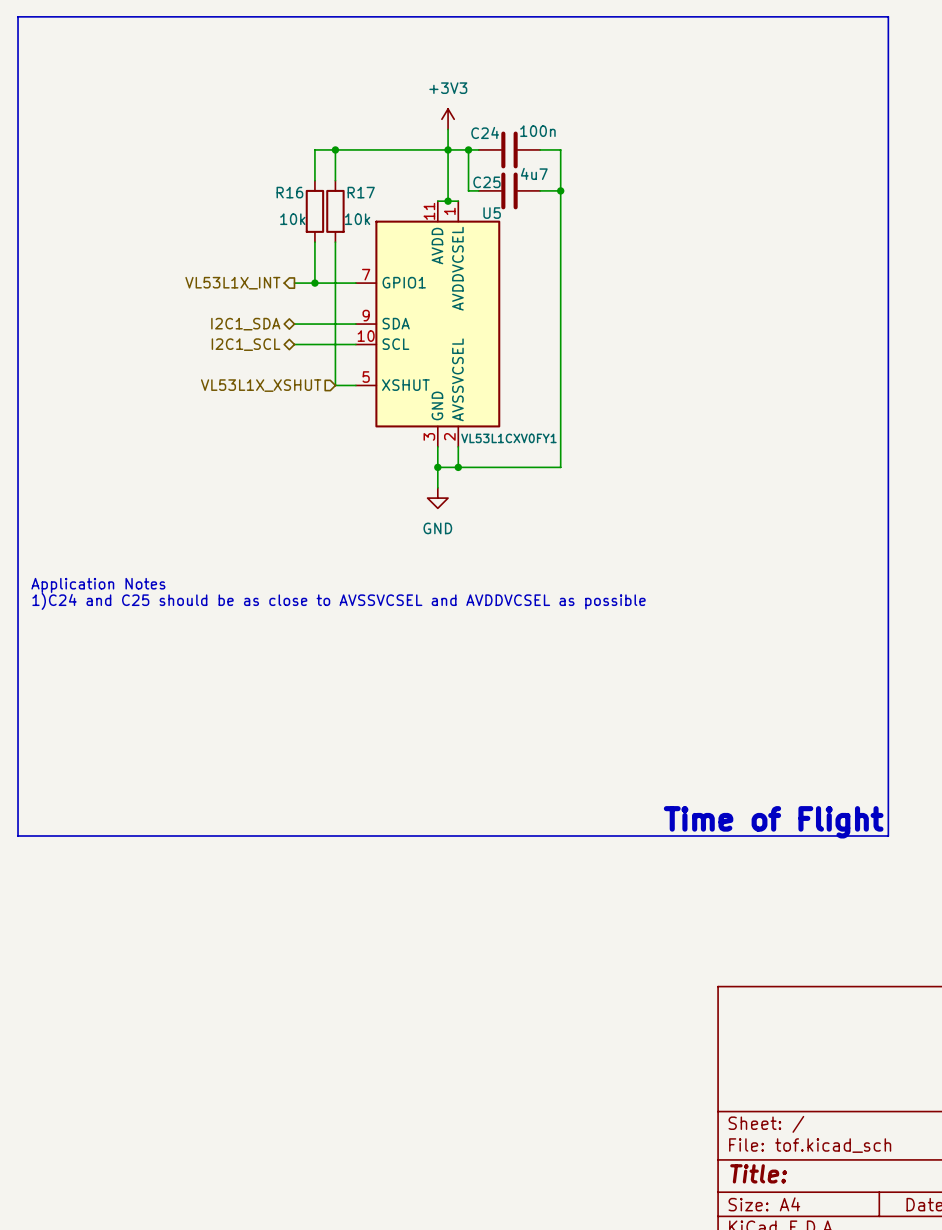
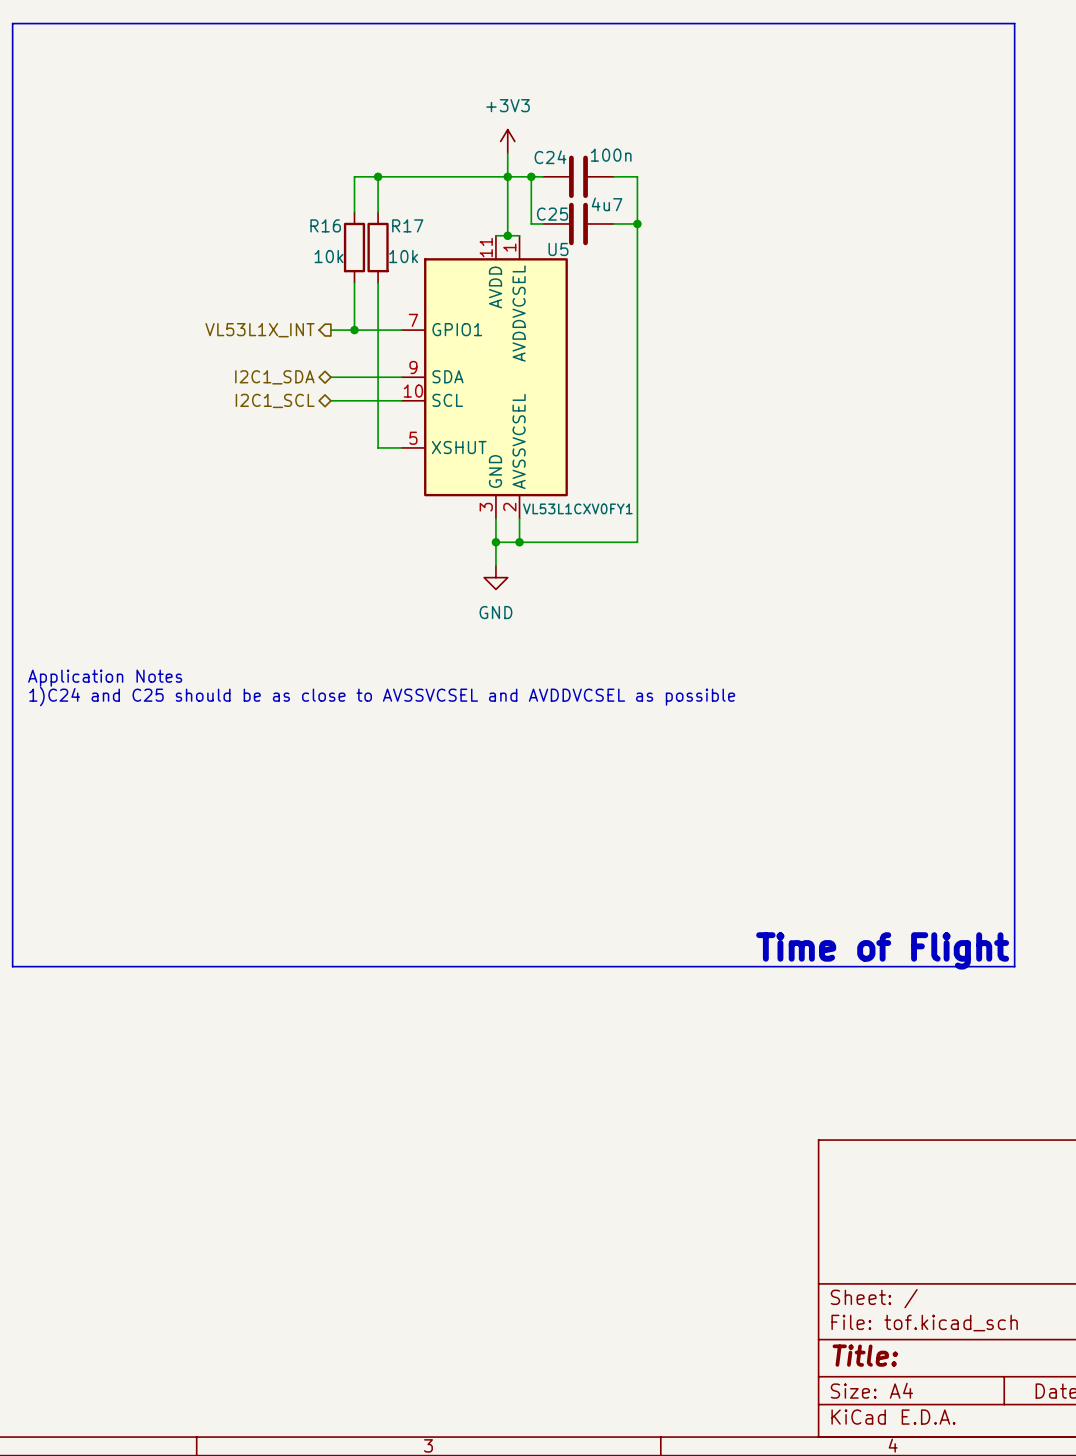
hierarchical label: VL53L1X_XSHUT (261, 385) -> none

